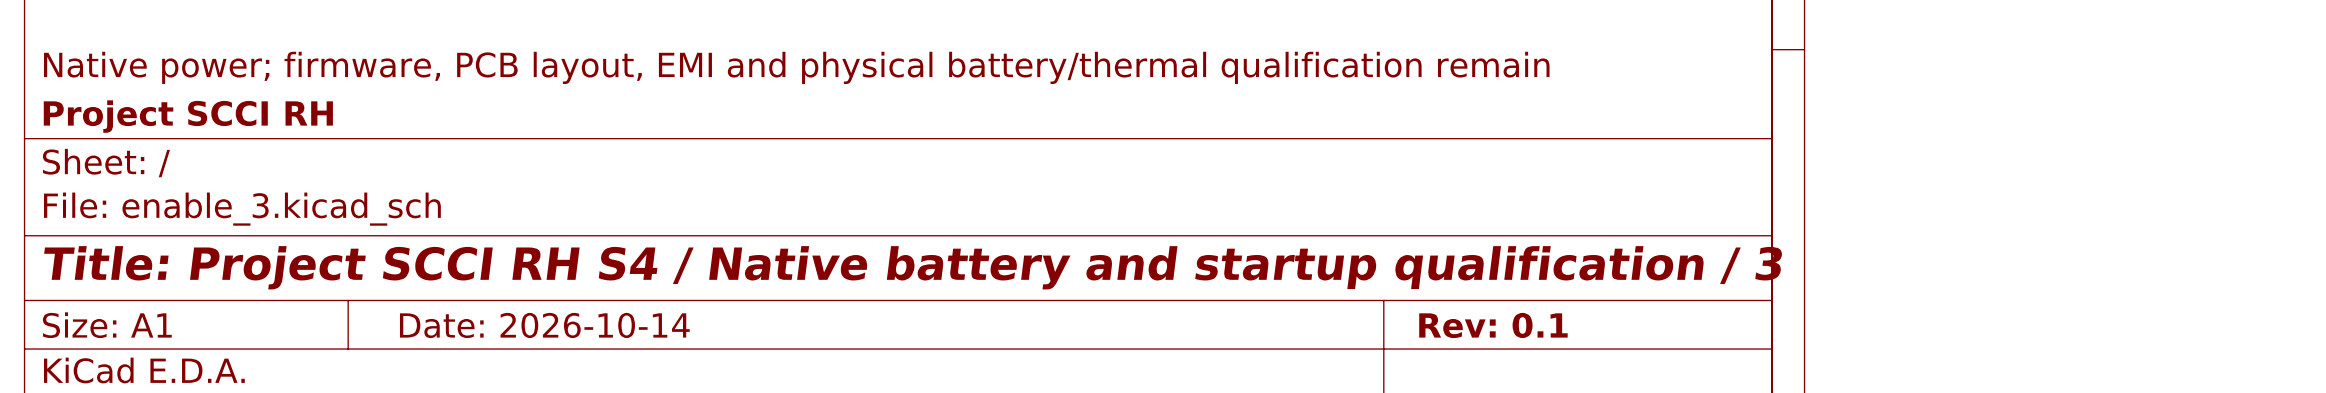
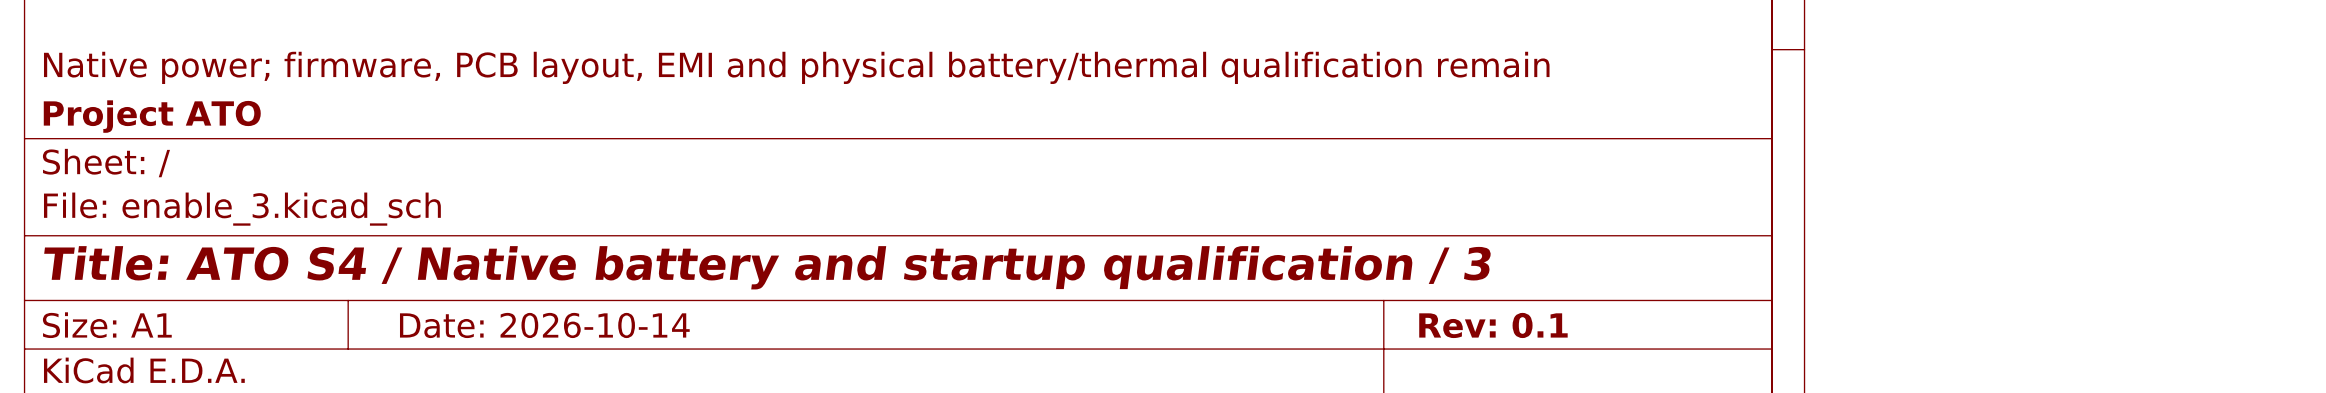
title block: Project SCCI RH (188, 116) -> Project ATO (152, 116)
title block: Title: Project SCCI RH S4 / Native battery and startup qualification / 3 (913, 267) -> Title: ATO S4 / Native battery and startup qualification / 3 (767, 267)

